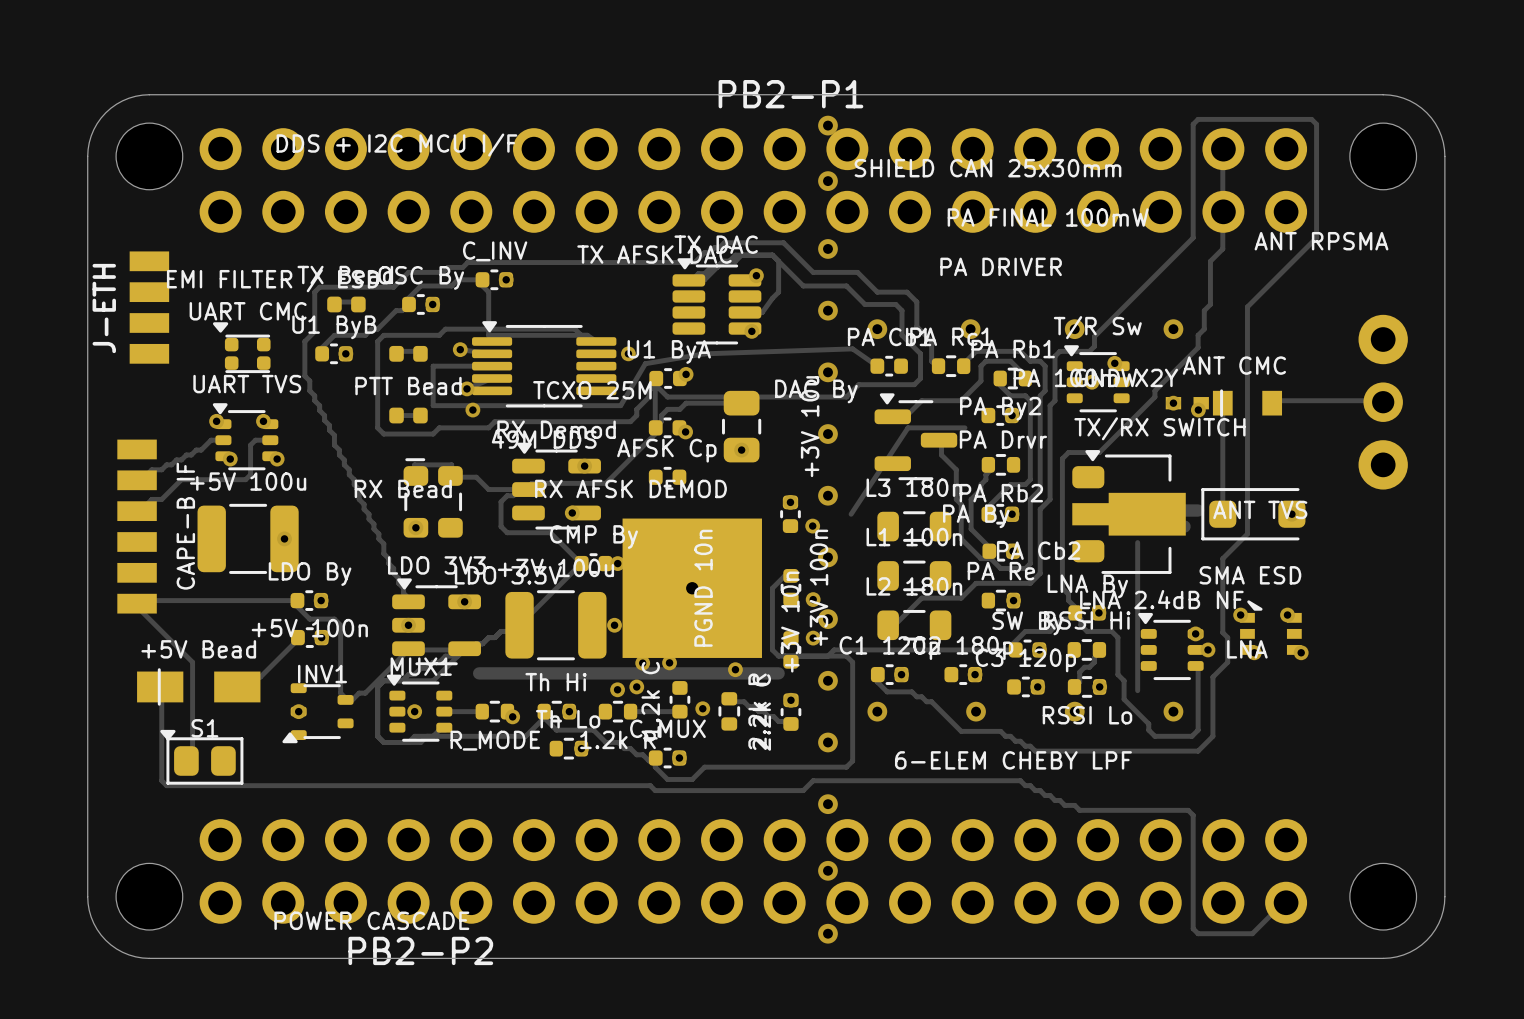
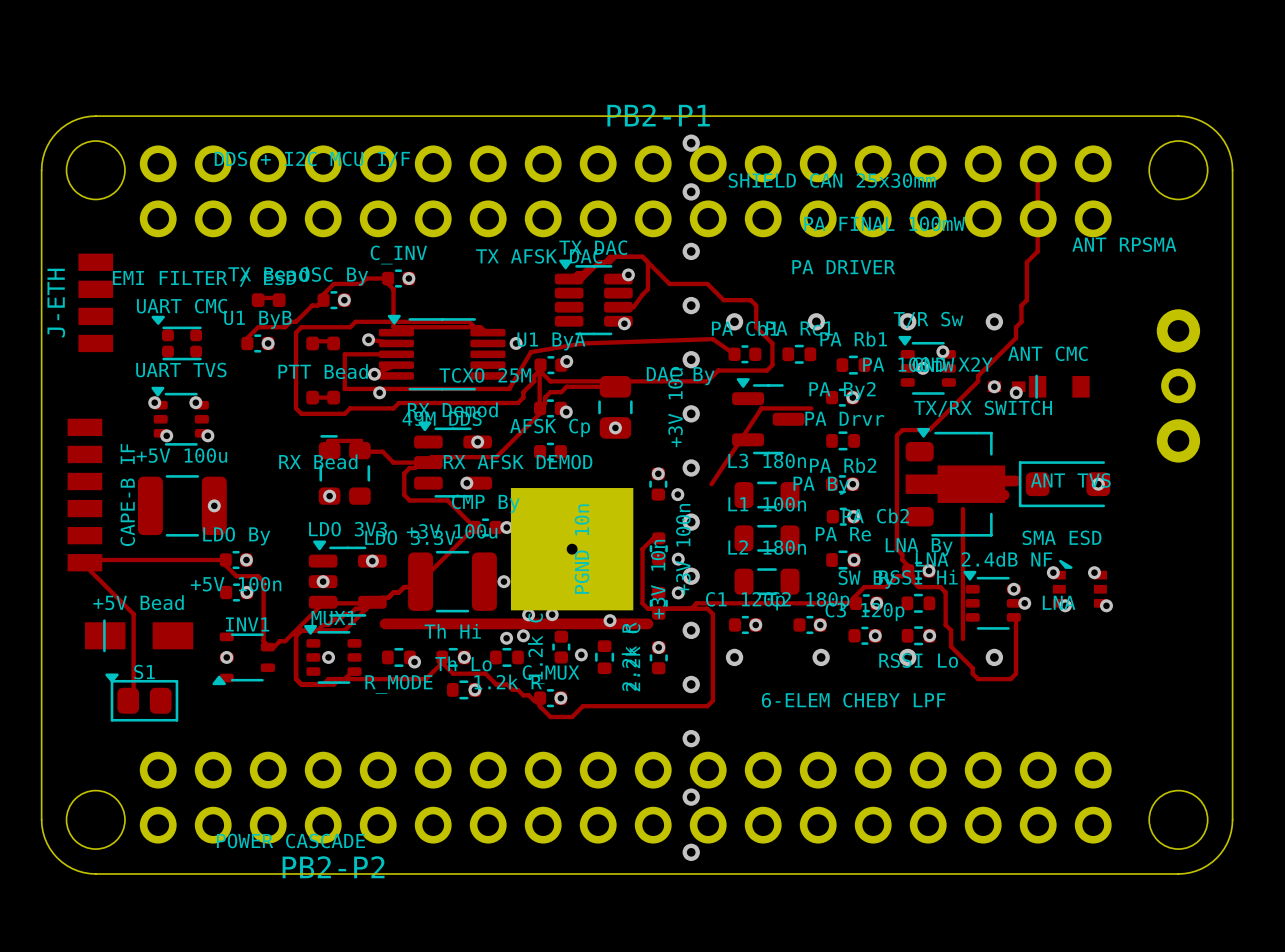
track: (936, 366) (931, 361) (931, 341) (916, 326) (916, 302) (906, 292) (877, 292) (857, 272) (813, 272) (783, 242) (724, 242) (709, 252) (704, 252) (694, 262) (467, 262) (462, 267) (447, 267) (443, 272) (408, 272) (393, 287) (319, 287) (314, 292) (314, 331) (304, 341) (304, 376) (309, 380) (309, 390) (314, 395) (314, 400) (319, 405) (319, 410) (324, 415) (324, 420) (334, 435) (334, 445) (339, 450) (339, 455) (349, 469) (349, 474) (359, 489) (359, 499) (364, 504) (364, 509) (369, 514) (369, 519) (373, 524) (373, 529) (383, 543) (383, 553) (388, 558) (388, 563) (393, 568) (393, 573) (398, 578) (398, 583) (403, 588) (403, 593) (408, 598) (408, 603) -> none
track: (961, 366) (976, 351) (1020, 351) (1030, 361) (1040, 361) (1045, 366) (1045, 390) (1040, 395) (1040, 489) (1030, 499) (1030, 563) (1025, 568) (1000, 568) (990, 558) (980, 558) (961, 538) (961, 504) (956, 499) (956, 469) (941, 455) (941, 440) -> none
track: (1000, 380) (1000, 385) (1010, 395) (1025, 395) (1030, 400) (1030, 479) (1025, 484) (1010, 484) (990, 504) (990, 514) -> none
track: (1025, 380) (1025, 376) (1010, 361) (985, 361) (980, 366) (980, 380) (961, 400) (921, 400) (906, 415) (892, 415) -> none
track: (1222, 400) (1222, 514) -> none
track: (1272, 400) (1385, 400) -> none
track: (220, 440) (211, 440) (201, 450) (196, 450) (191, 455) (186, 455) (181, 459) (176, 459) (161, 469) (151, 469) (137, 479) -> none
track: (270, 440) (255, 440) (250, 445) (250, 474) (245, 479) (181, 479) (161, 499) (151, 499) (137, 509) -> none
track: (990, 464) (990, 469) (985, 474) (985, 479) (980, 484) (980, 489) (971, 499) (971, 529) (990, 548) -> none
track: (887, 627) (892, 627) (921, 598) (961, 598) (976, 583) (1030, 583) (1040, 573) (1040, 509) (1050, 499) (1050, 405) (1055, 400) (1055, 356) (1059, 351) (1089, 351) (1094, 346) (1094, 336) (1193, 237) (1193, 124) (1198, 119) (1311, 119) (1316, 124) (1316, 237) (1247, 306) (1247, 533) (1222, 558) (1222, 632) (1227, 637) (1227, 662) (1212, 677) (1212, 736) (1198, 751) (1035, 751) (1020, 741) (1015, 741) (1010, 736) (1005, 736) (1000, 731) (961, 731) (931, 701) (926, 701) (921, 696) (916, 696) (911, 691) (887, 691) (877, 682) (877, 677) -> none
track: (299, 637) (260, 677) (255, 677) (240, 686) (235, 686) -> none
track: (1099, 647) (1099, 652) (1094, 657) (1094, 662) (1079, 672) (1079, 682) (1074, 686) -> none
track: (161, 686) (161, 780) (166, 785) (650, 785) (655, 790) (803, 790) (813, 780) (1020, 780) (1025, 785) (1030, 785) (1035, 790) (1040, 790) (1055, 800) (1059, 800) (1064, 805) (1074, 805) (1079, 810) (1188, 810) (1193, 815) (1193, 928) (1198, 933) (1252, 933) (1282, 904) (1286, 904) -> none
track: (729, 696) (734, 701) (744, 701) (758, 711) (763, 711) (768, 716) (773, 716) (778, 721) (783, 721) (788, 726) (793, 726) -> none
track: (443, 711) (482, 711) -> none
track: (630, 711) (679, 711) -> none

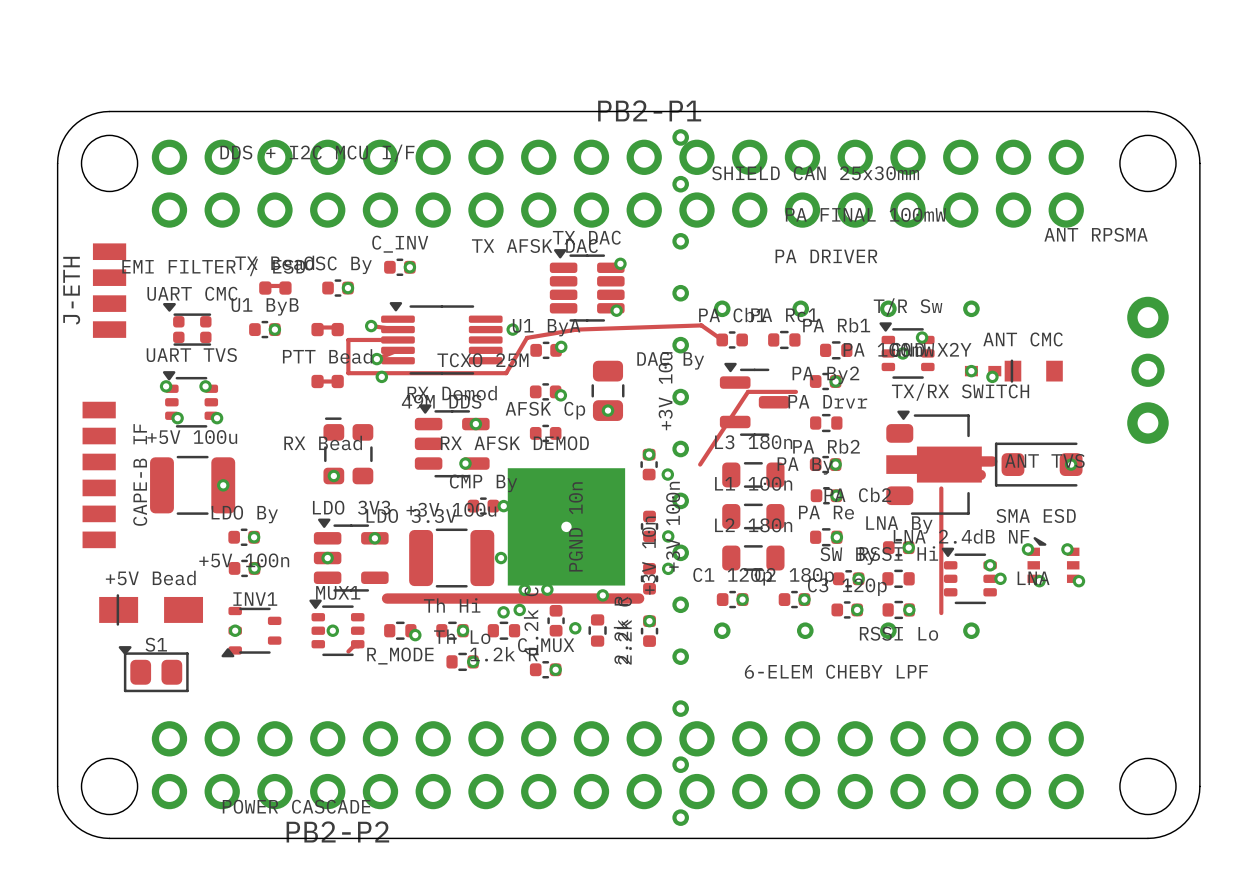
track: (1037, 164) (1037, 251) (1026, 262) (1026, 300) (1021, 305) (1021, 321) (1016, 327) (1016, 338) (978, 375) (978, 381) (929, 430) (902, 430) (896, 435) (896, 549) (902, 554) (902, 560) (907, 565) (907, 570) -> none
track: (615, 256) (610, 262) (599, 262) (582, 278) (566, 278) -> none
track: (604, 262) (610, 256) (642, 256) (669, 283) (707, 283) (723, 300) (750, 300) (756, 305) (756, 327) (772, 343) (772, 365) (767, 370) (718, 370) (707, 381) (550, 381) (539, 370) (534, 375) (534, 381) (523, 392) (523, 397) (518, 403) (398, 403) (393, 408) (350, 408) (344, 413) (301, 413) (296, 408) (296, 332) (301, 327) (350, 327) (355, 321) (469, 321) (474, 327) -> none
track: (647, 262) (647, 289) (633, 307) (618, 307) -> none
track: (593, 267) (588, 267) (582, 273) (577, 273) (572, 278) -> none
track: (487, 332) (480, 327) (393, 327) (393, 289) (388, 283) (388, 278) (366, 278) (361, 283) (333, 283) (323, 294) (323, 300) (317, 305) (312, 305) (296, 321) (290, 321) (285, 327) (258, 327) (247, 338) (247, 343) -> none
track: (539, 365) (539, 413) (496, 457) (431, 457) (425, 462) (393, 462) (382, 451) (361, 451) (361, 440) (328, 440) (328, 451) -> none
track: (615, 386) (566, 386) (561, 392) (550, 392) (545, 397) (545, 403) (539, 408) -> none
track: (420, 462) (415, 467) (409, 467) (404, 473) (404, 495) (409, 500) (447, 500) (474, 527) (420, 581) (415, 581) (409, 587) (404, 587) (398, 592) (393, 592) (388, 597) (382, 597) (377, 603) (323, 603) (285, 641) (279, 641) (274, 646) (268, 646) (263, 641) (263, 581) (258, 576) (236, 576) (225, 565) (225, 560) (84, 560) (84, 565) (133, 614) (133, 689) (128, 695) (128, 700) -> none
track: (658, 538) (653, 538) (642, 549) (642, 603) (647, 608) (707, 608) (712, 614) (712, 700) (707, 706) (582, 706) (572, 716) (550, 716) (539, 706) (539, 700) (534, 700) (528, 695) (523, 695) (518, 689) (512, 689) (507, 684) (496, 684) (485, 673) (453, 673) (442, 662) -> none
track: (907, 570) (902, 576) (896, 576) (886, 587) (864, 587) (853, 597) (853, 603) (696, 603) (691, 608) -> none
track: (907, 570) (913, 576) (913, 581) (918, 587) (940, 587) (945, 592) (945, 624) (951, 630) (951, 646) (972, 668) (972, 673) (978, 679) (1010, 679) (1016, 673) (1016, 619) -> none
track: (371, 603) (344, 630) (301, 630) (296, 635) (296, 679) (301, 684) (333, 684) (339, 679) -> none
track: (366, 608) (355, 608) (350, 614) (344, 614) (339, 619) (333, 619) (328, 624) (323, 624) (317, 630) -> none
track: (442, 662) (425, 679) (328, 679) (323, 684) -> none

